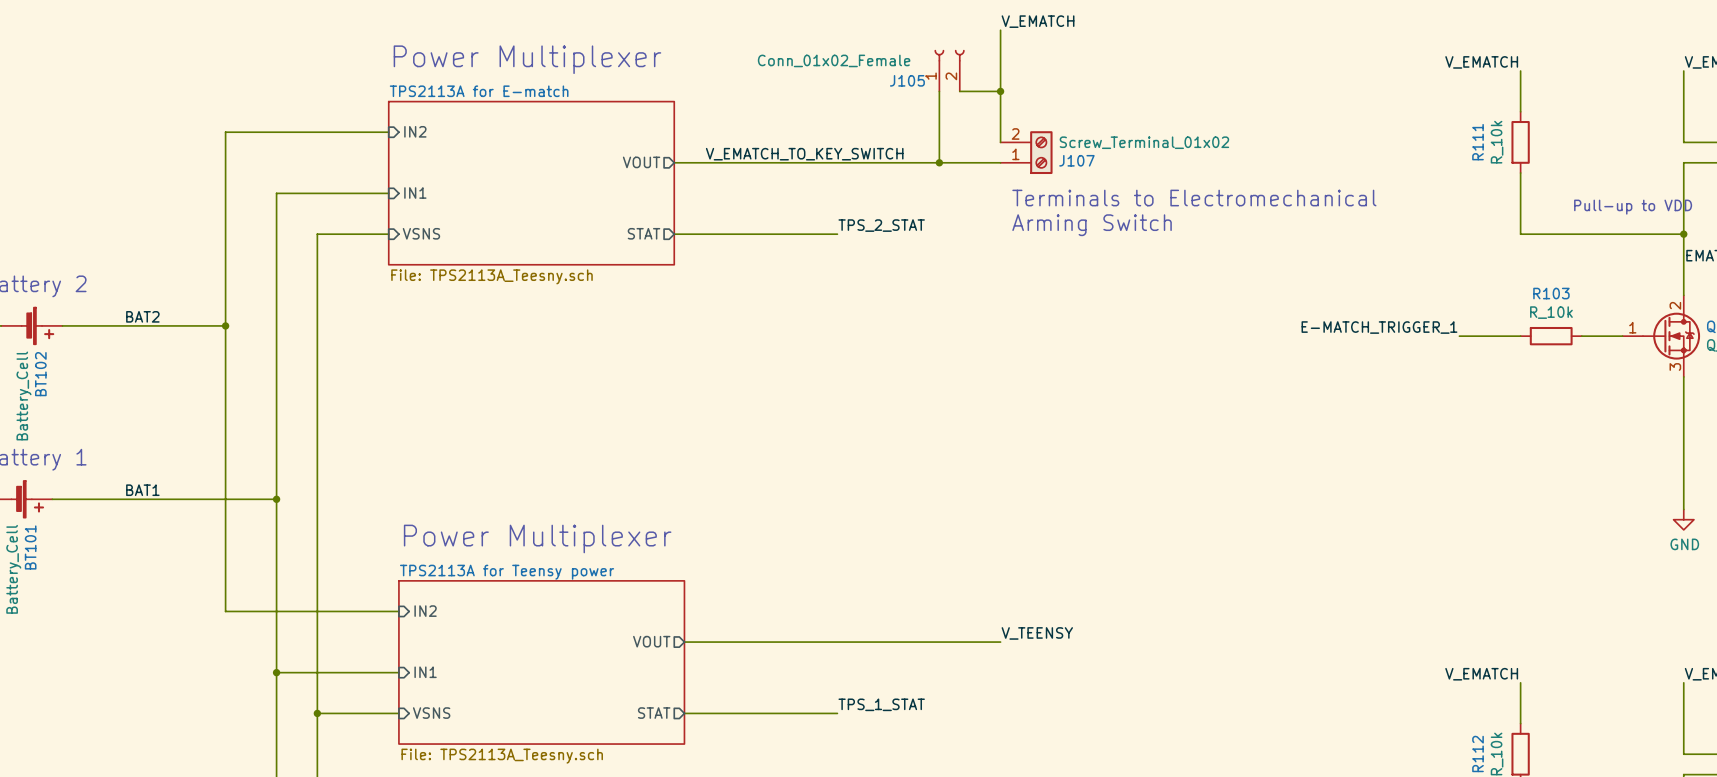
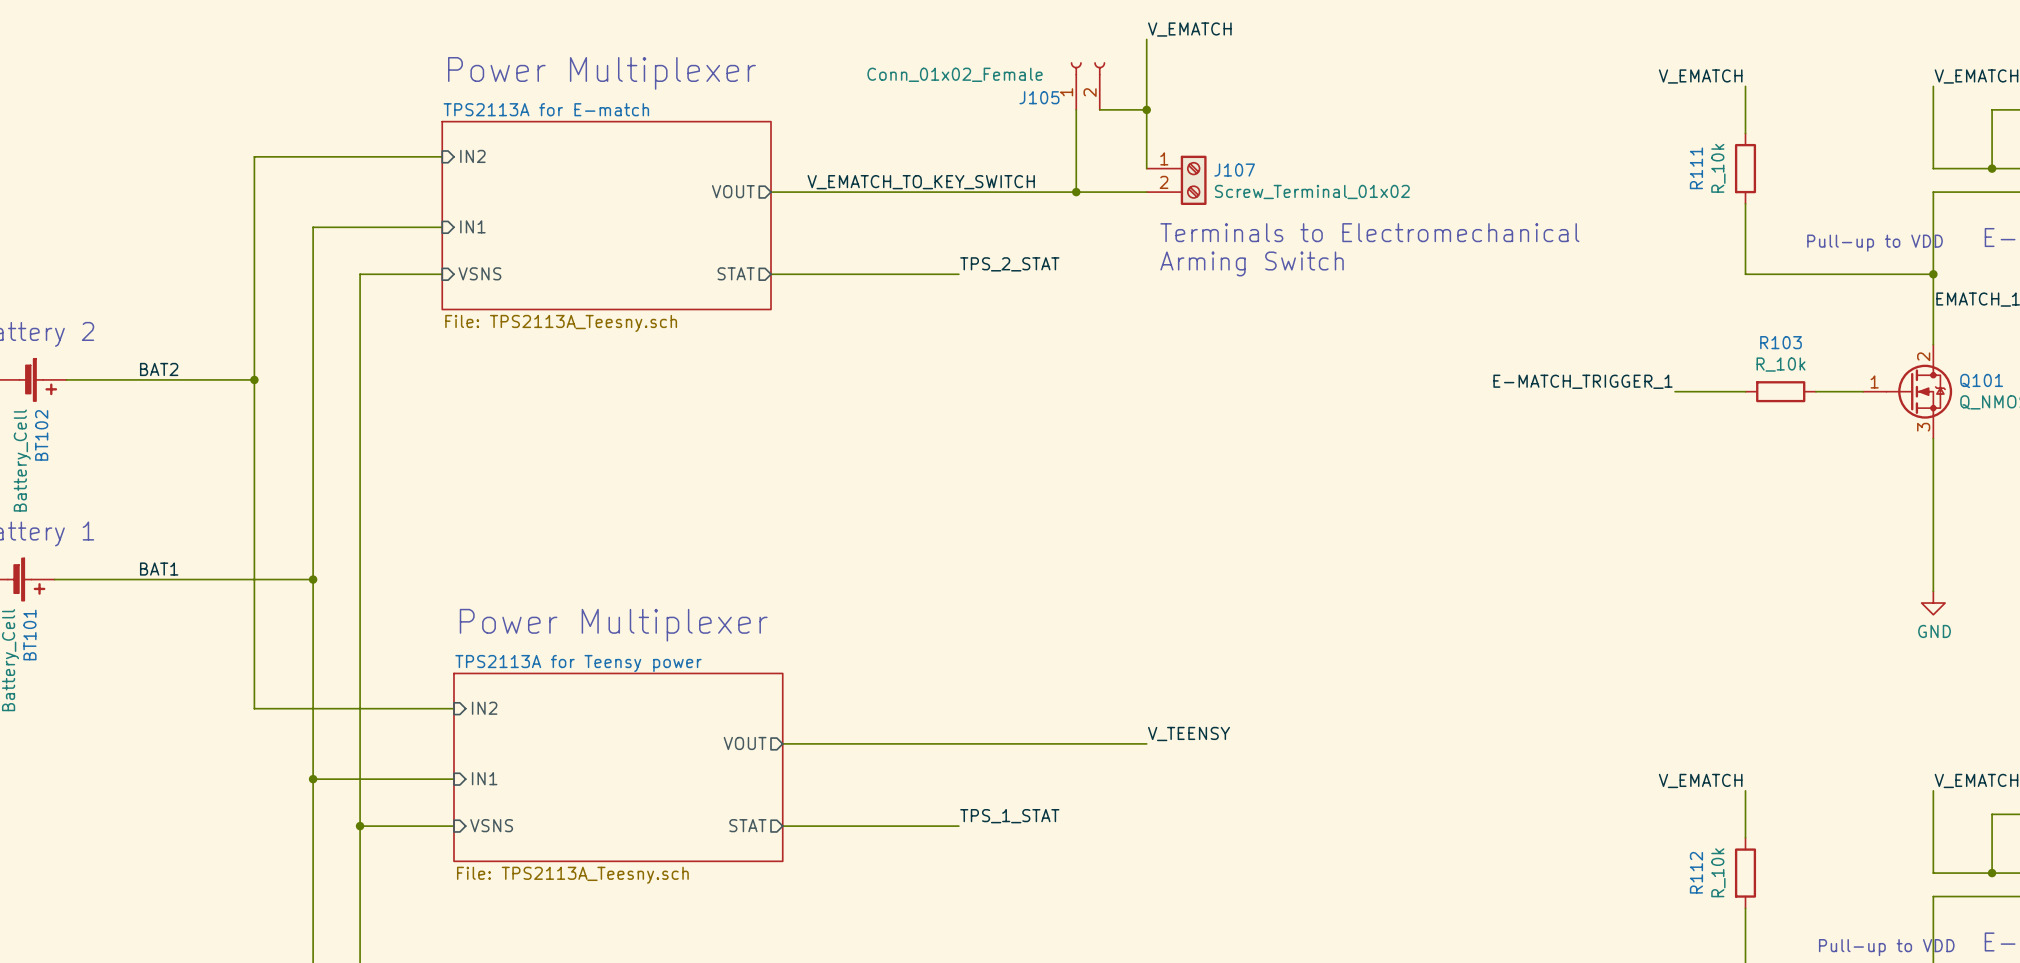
J107 flip: as is (1041, 152) -> up-down (1193, 180)

